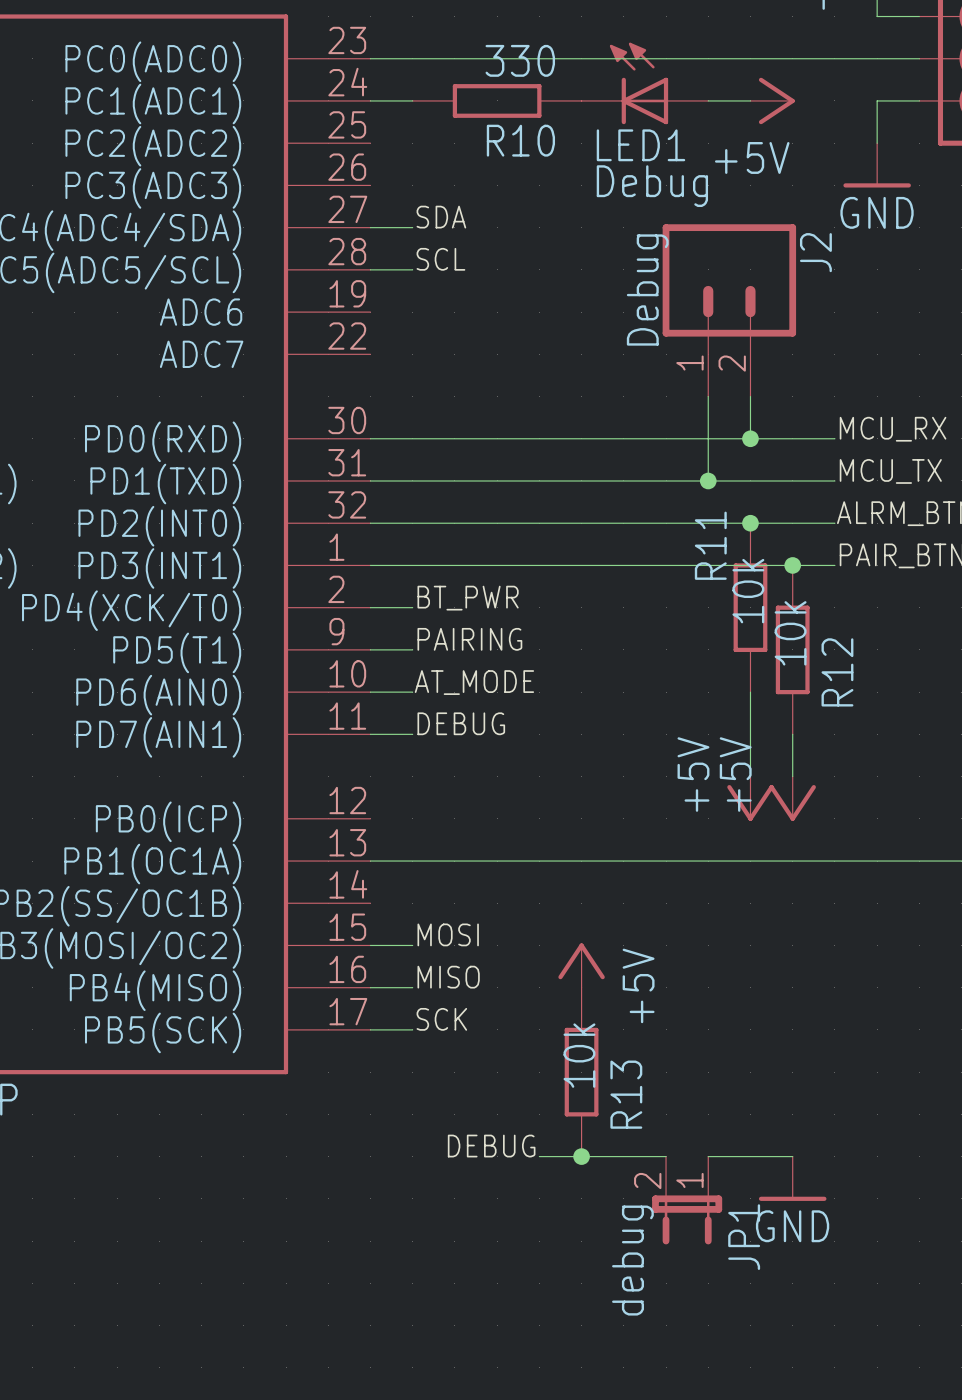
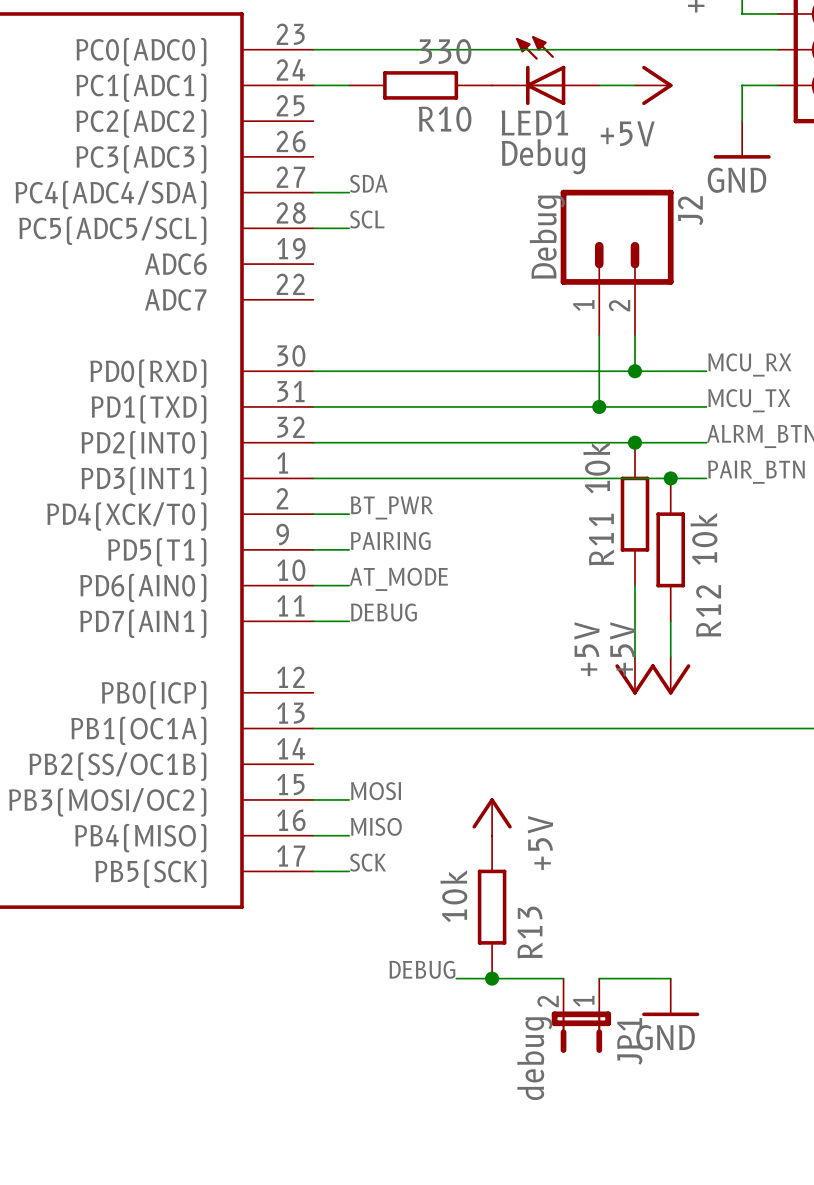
R11 name position: R11 (710, 545) -> R11 (601, 539)
R11 value position: 10k (748, 591) -> 10k (596, 467)
R12 value position: 10k (790, 633) -> 10k (703, 538)
R12 name position: R12 (837, 672) -> R12 (708, 610)
R13 value position: 10k (579, 1055) -> 10k (453, 896)

